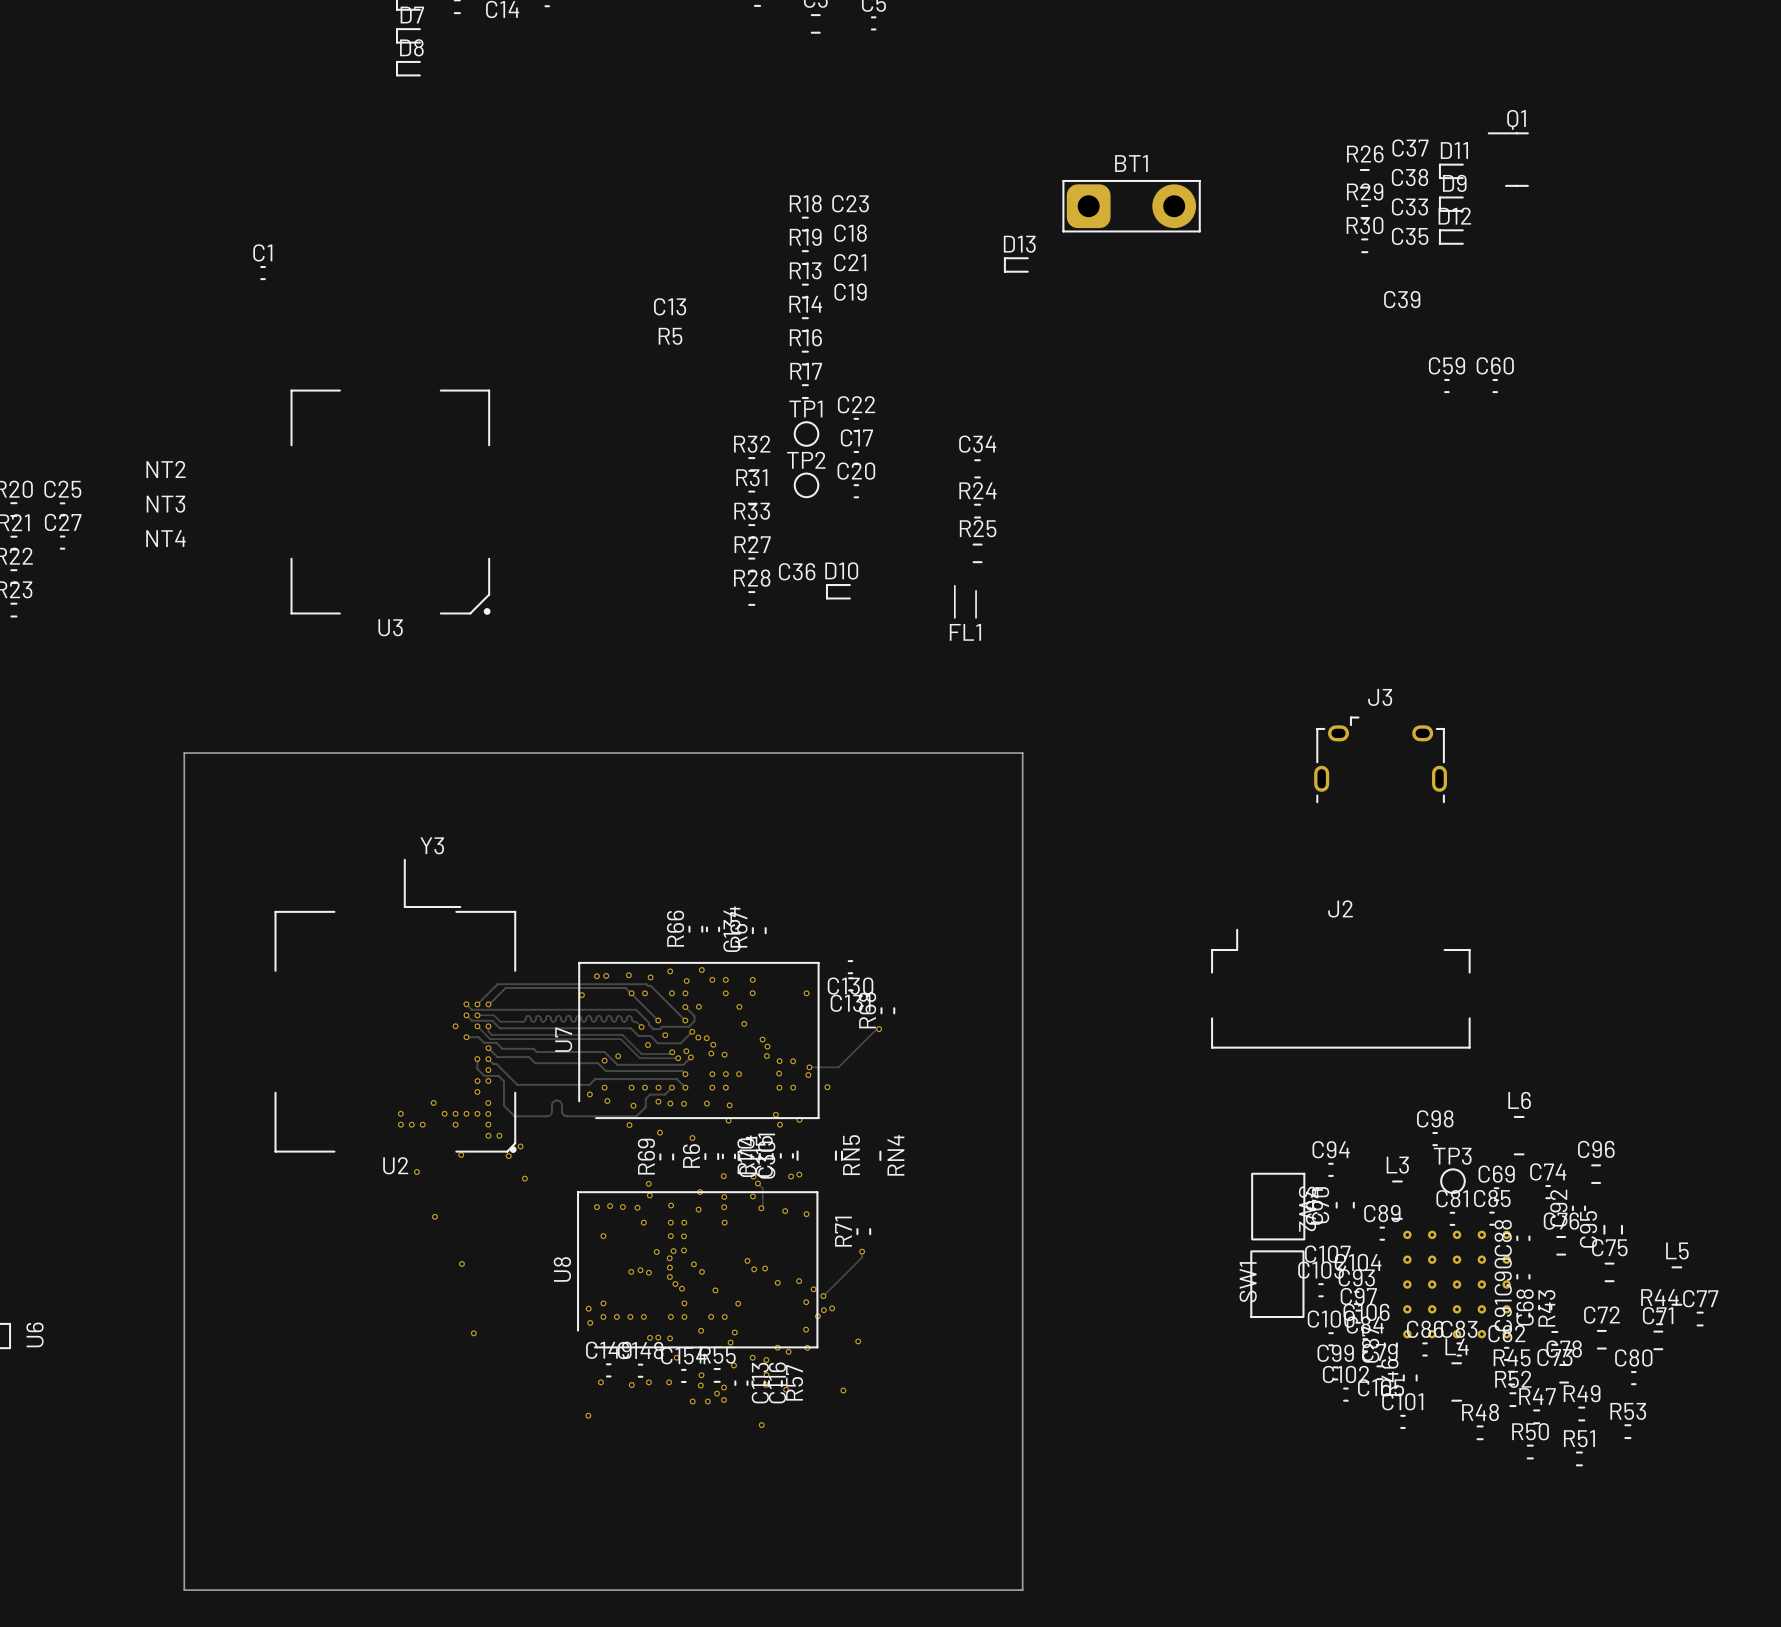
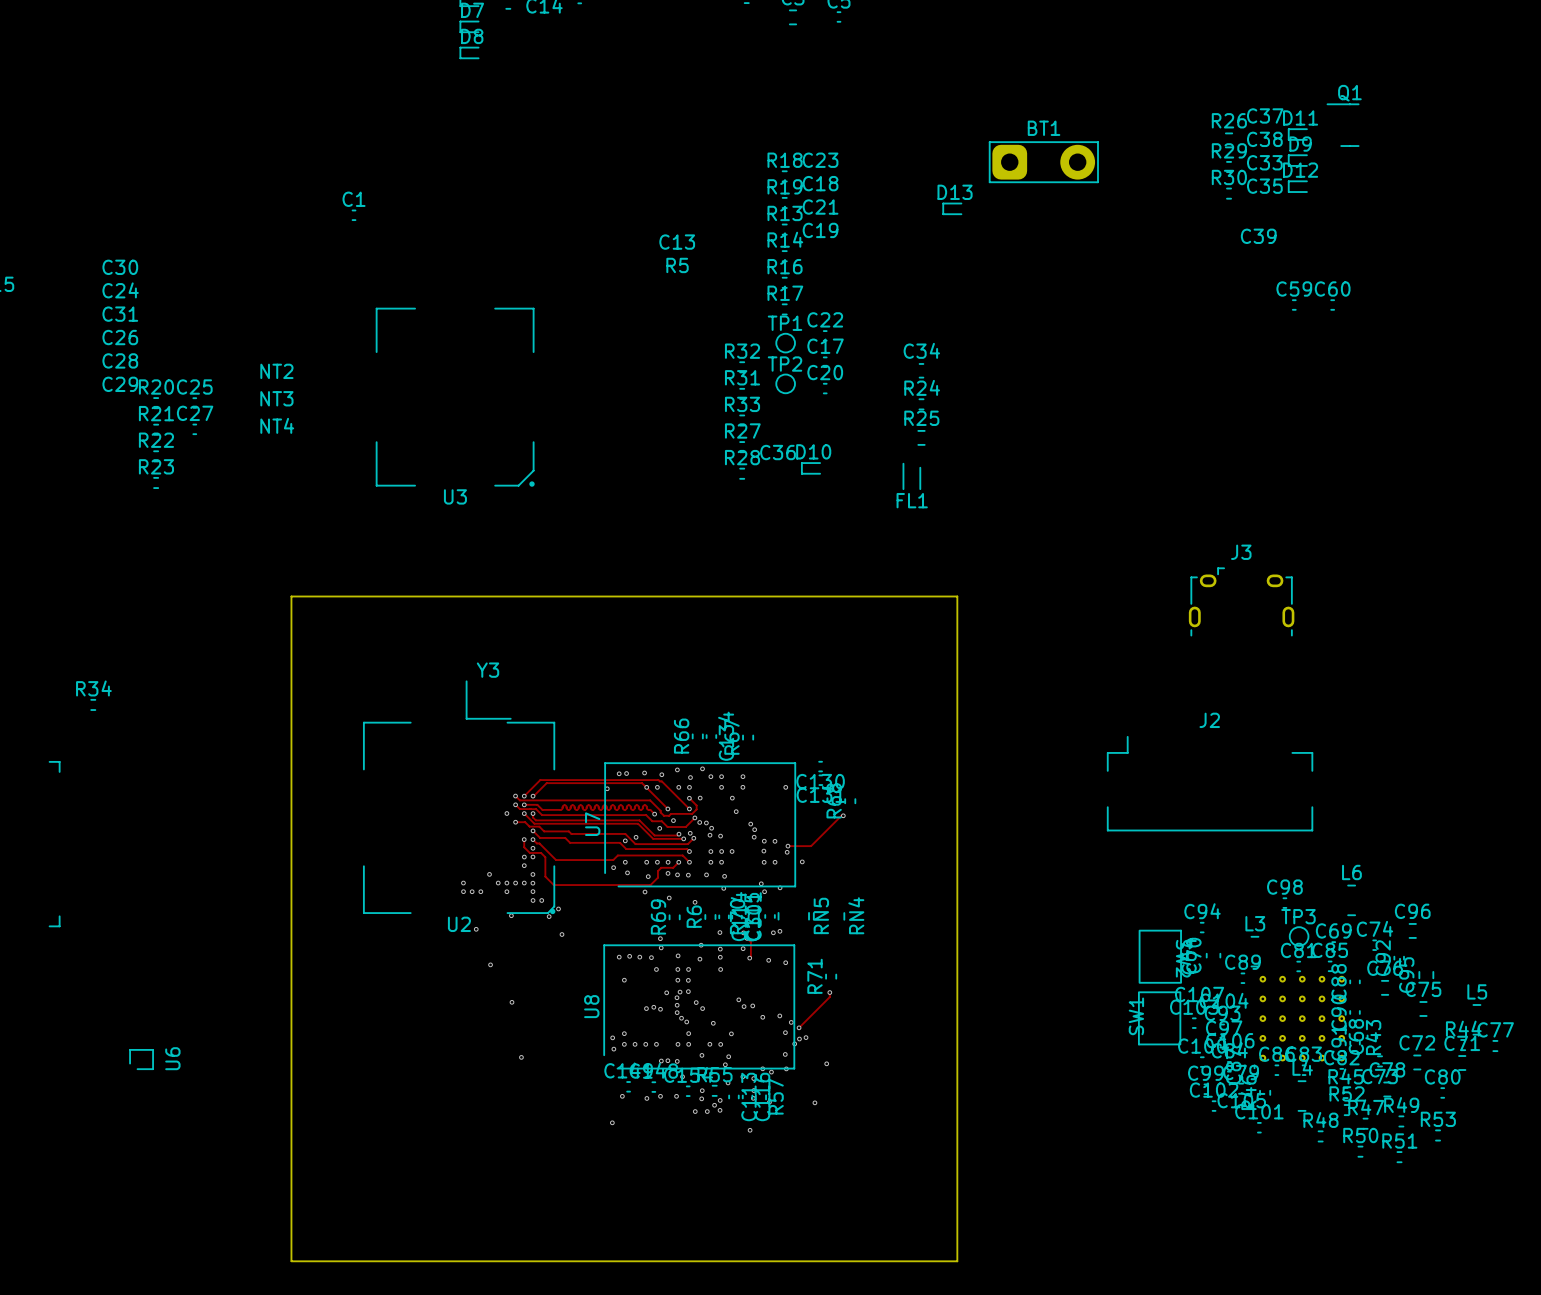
track: (546, 1116) (551, 1113) (552, 1103) (556, 1100) (561, 1103) (562, 1113) (567, 1116) -> (579, 885) (595, 885)

